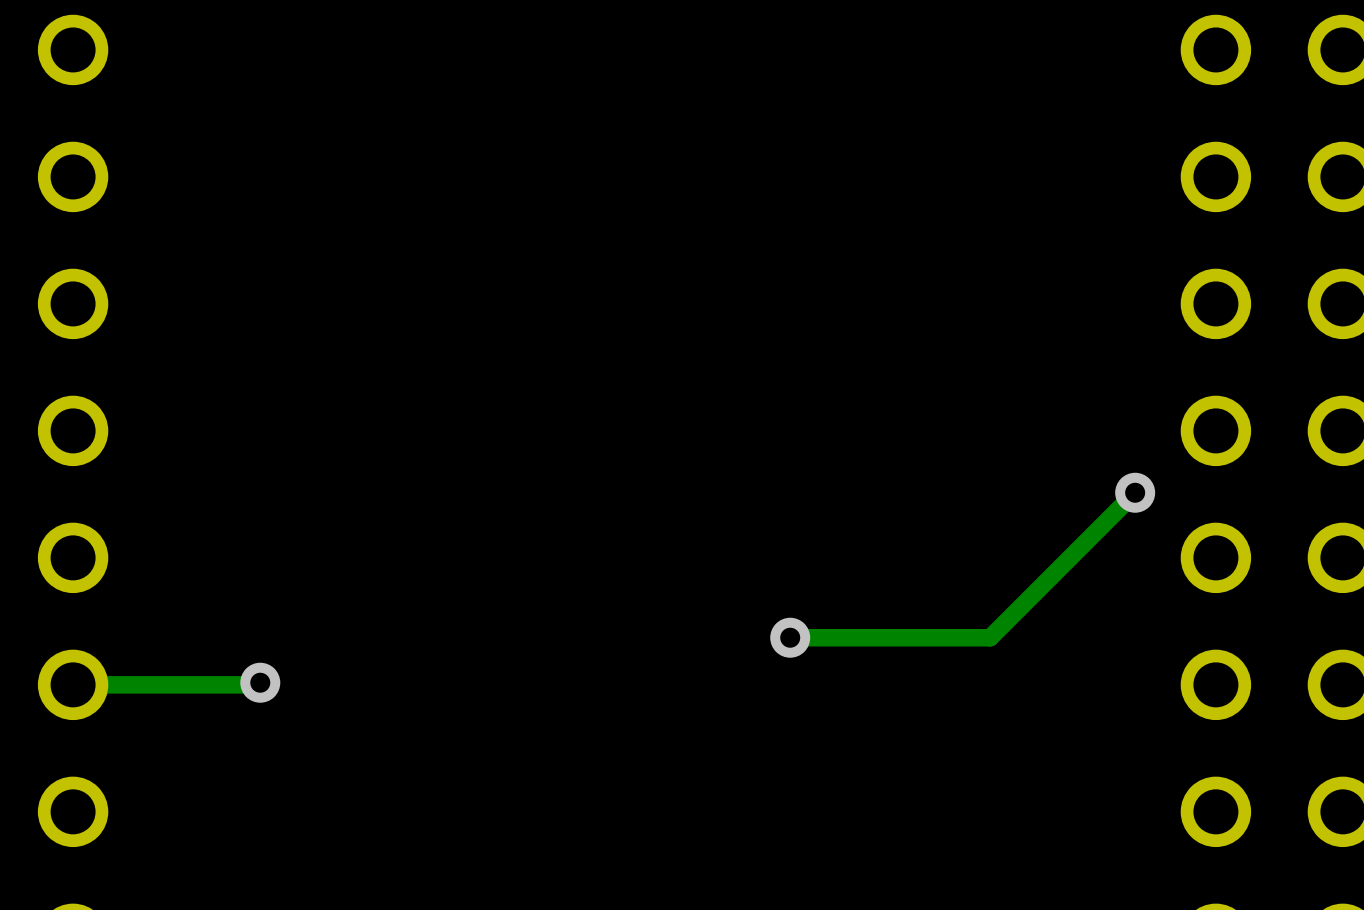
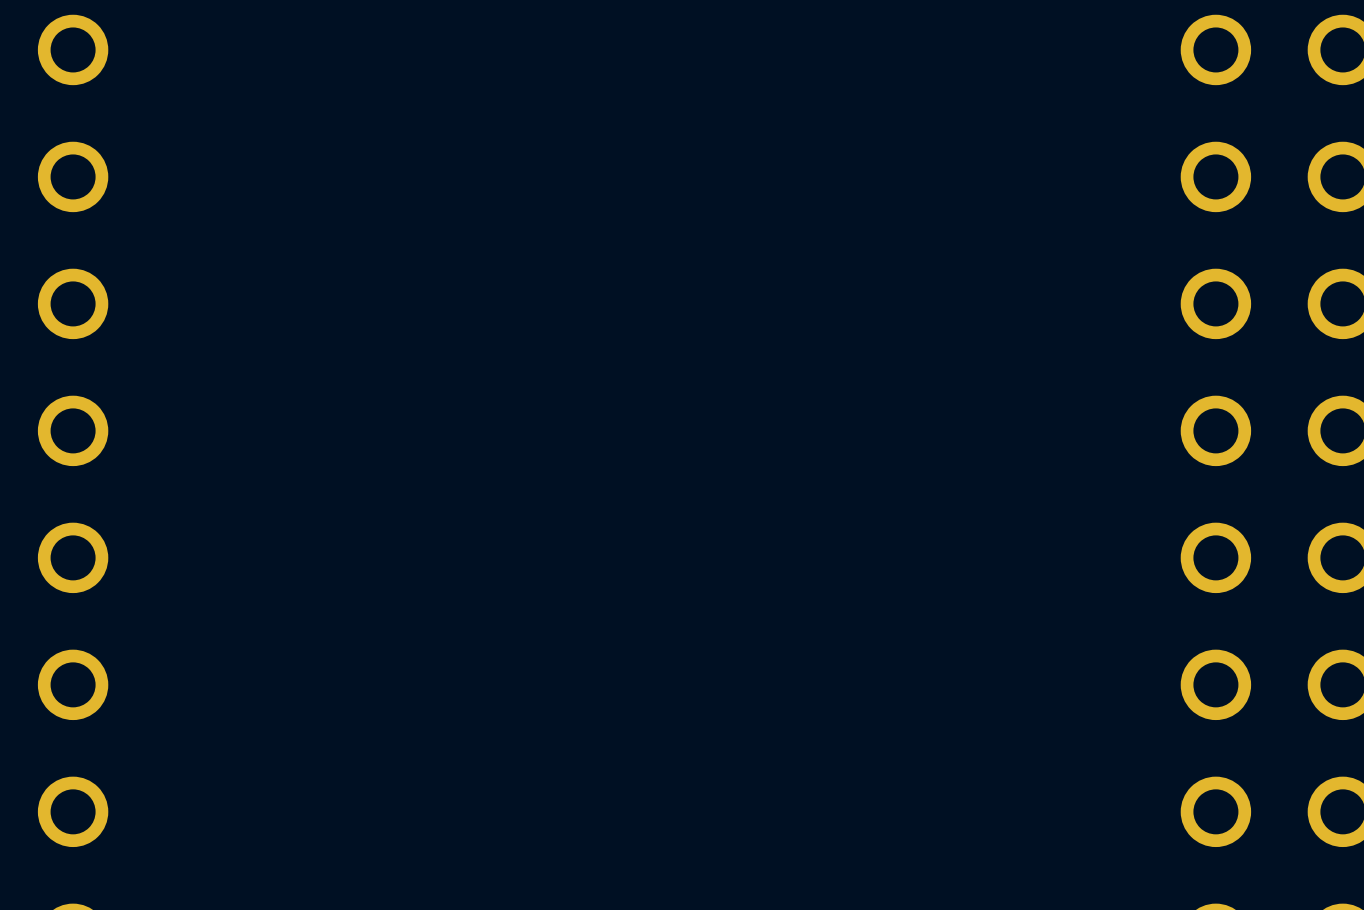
track: (1135, 492) (990, 637) (790, 637) -> none
via: (1135, 492) -> none
via: (790, 637) -> none
track: (260, 682) (258, 684) (73, 684) -> none
via: (260, 682) -> none

